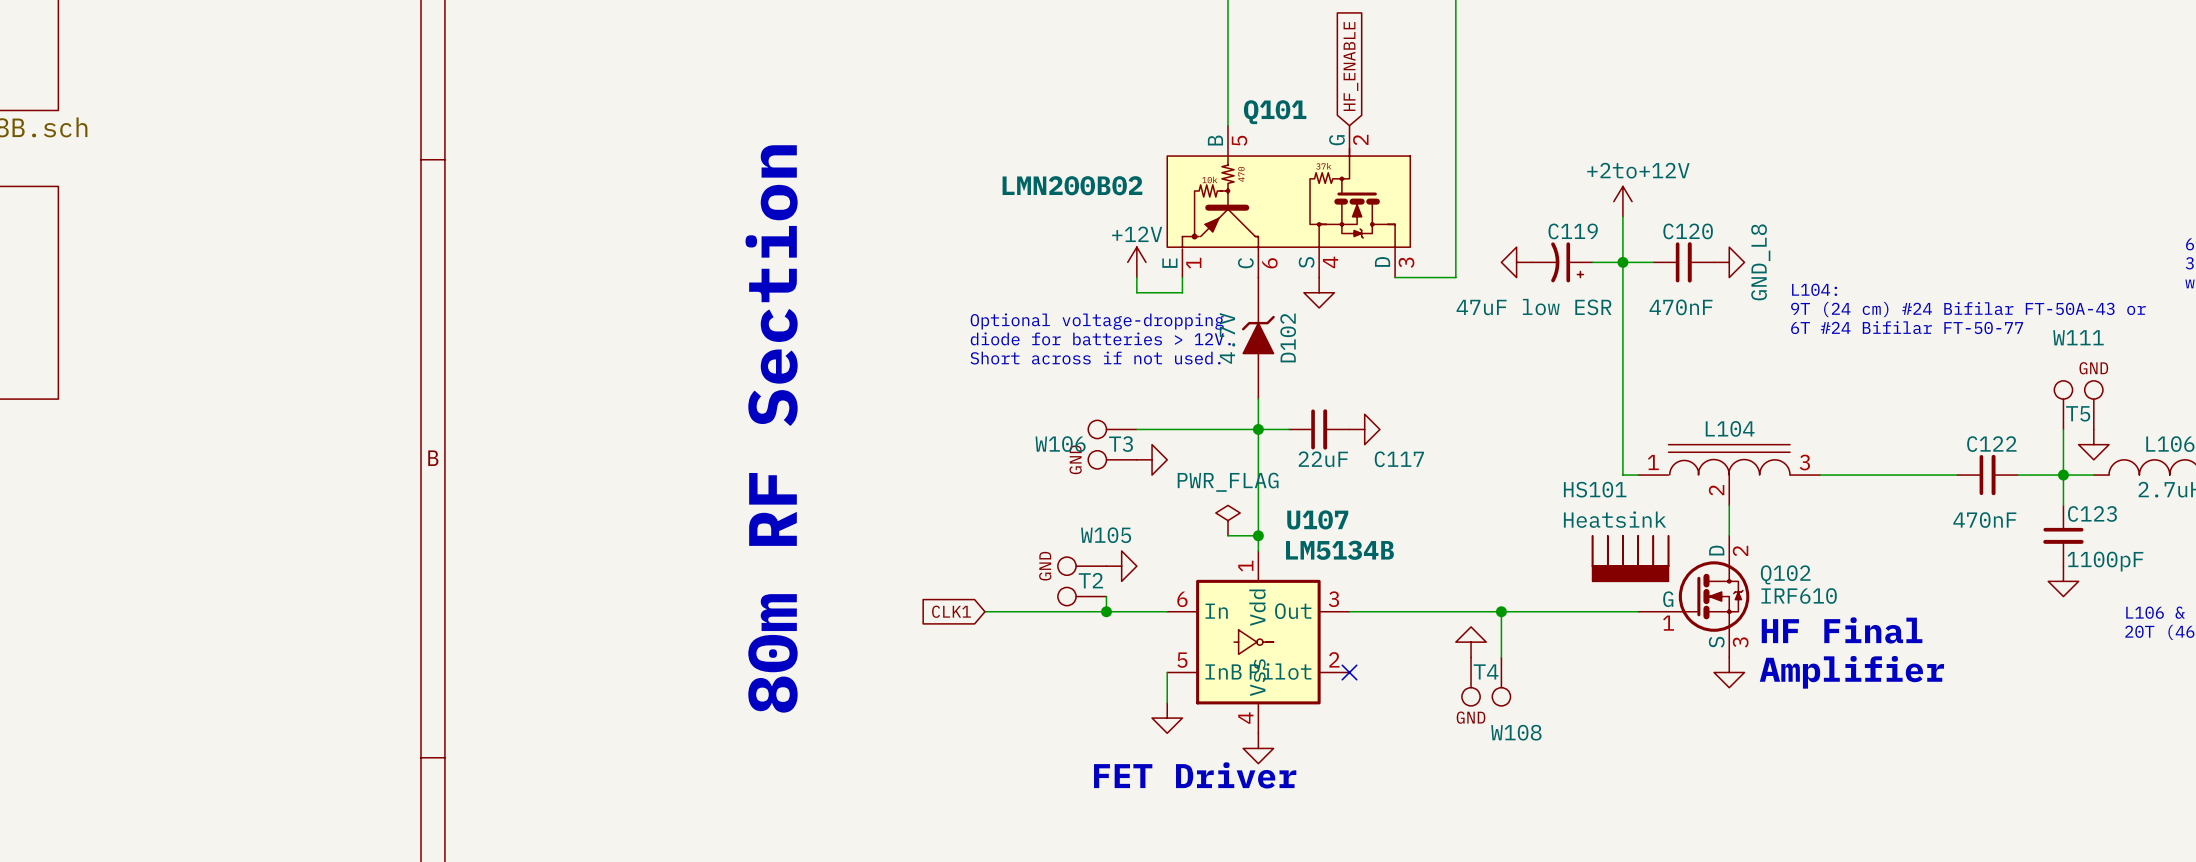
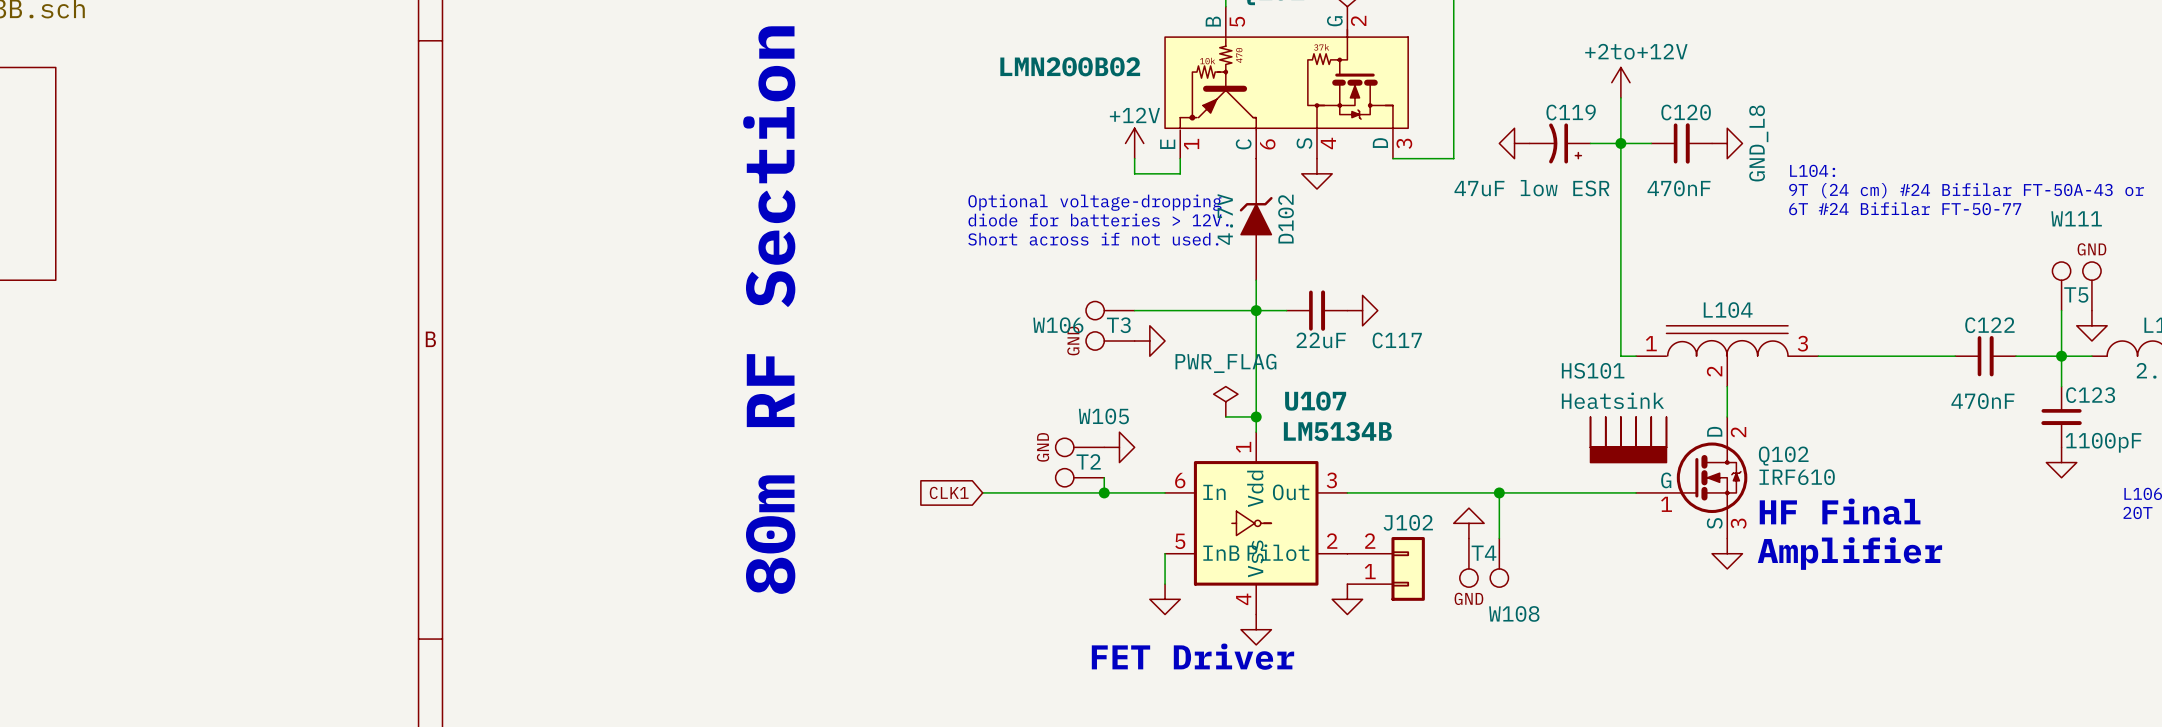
no-connect mark: (1349, 672) -> none
J102: none -> (1386, 568)
power symbol: none -> (1347, 599)

